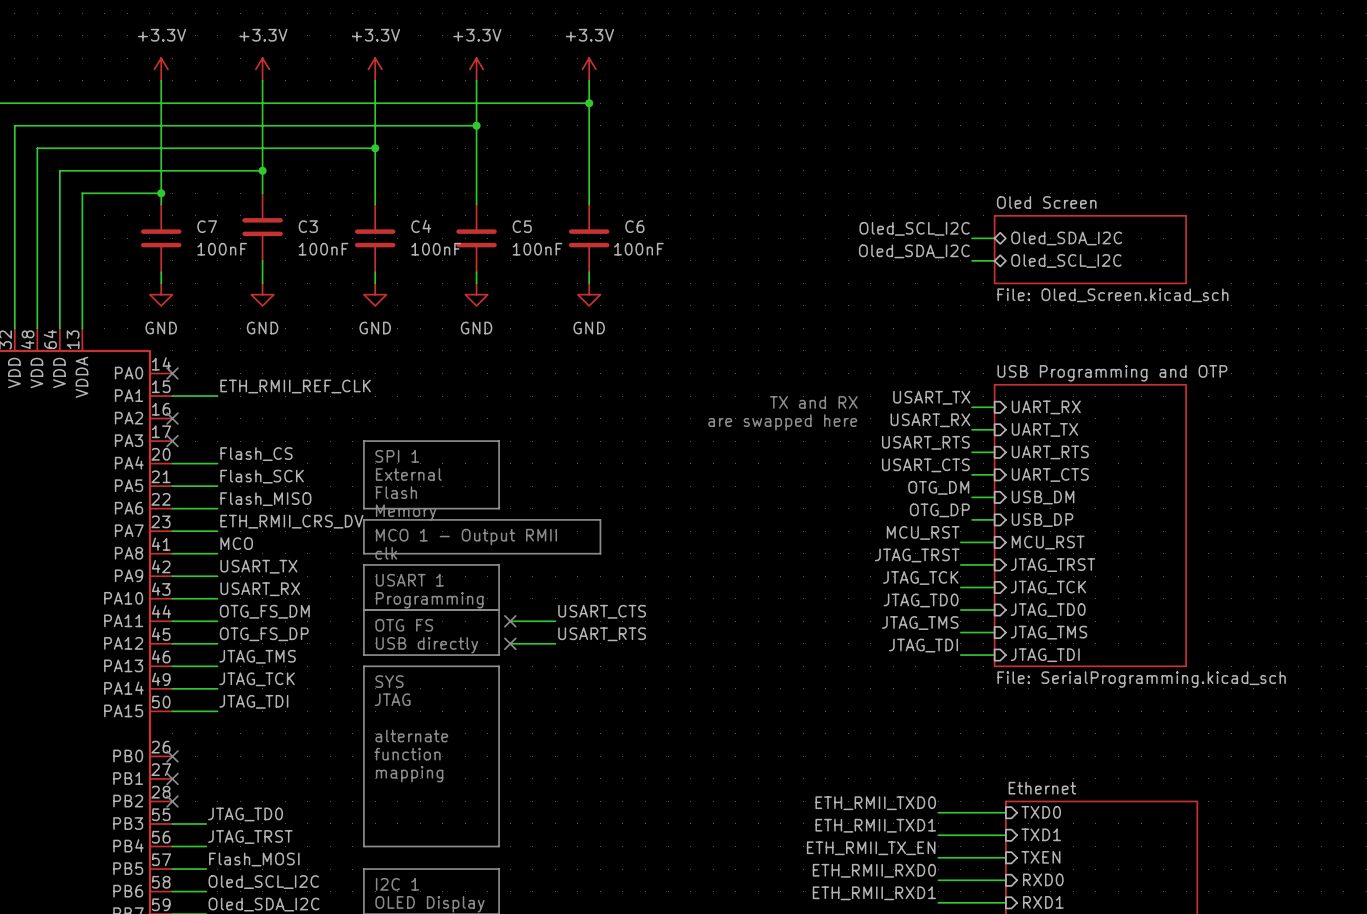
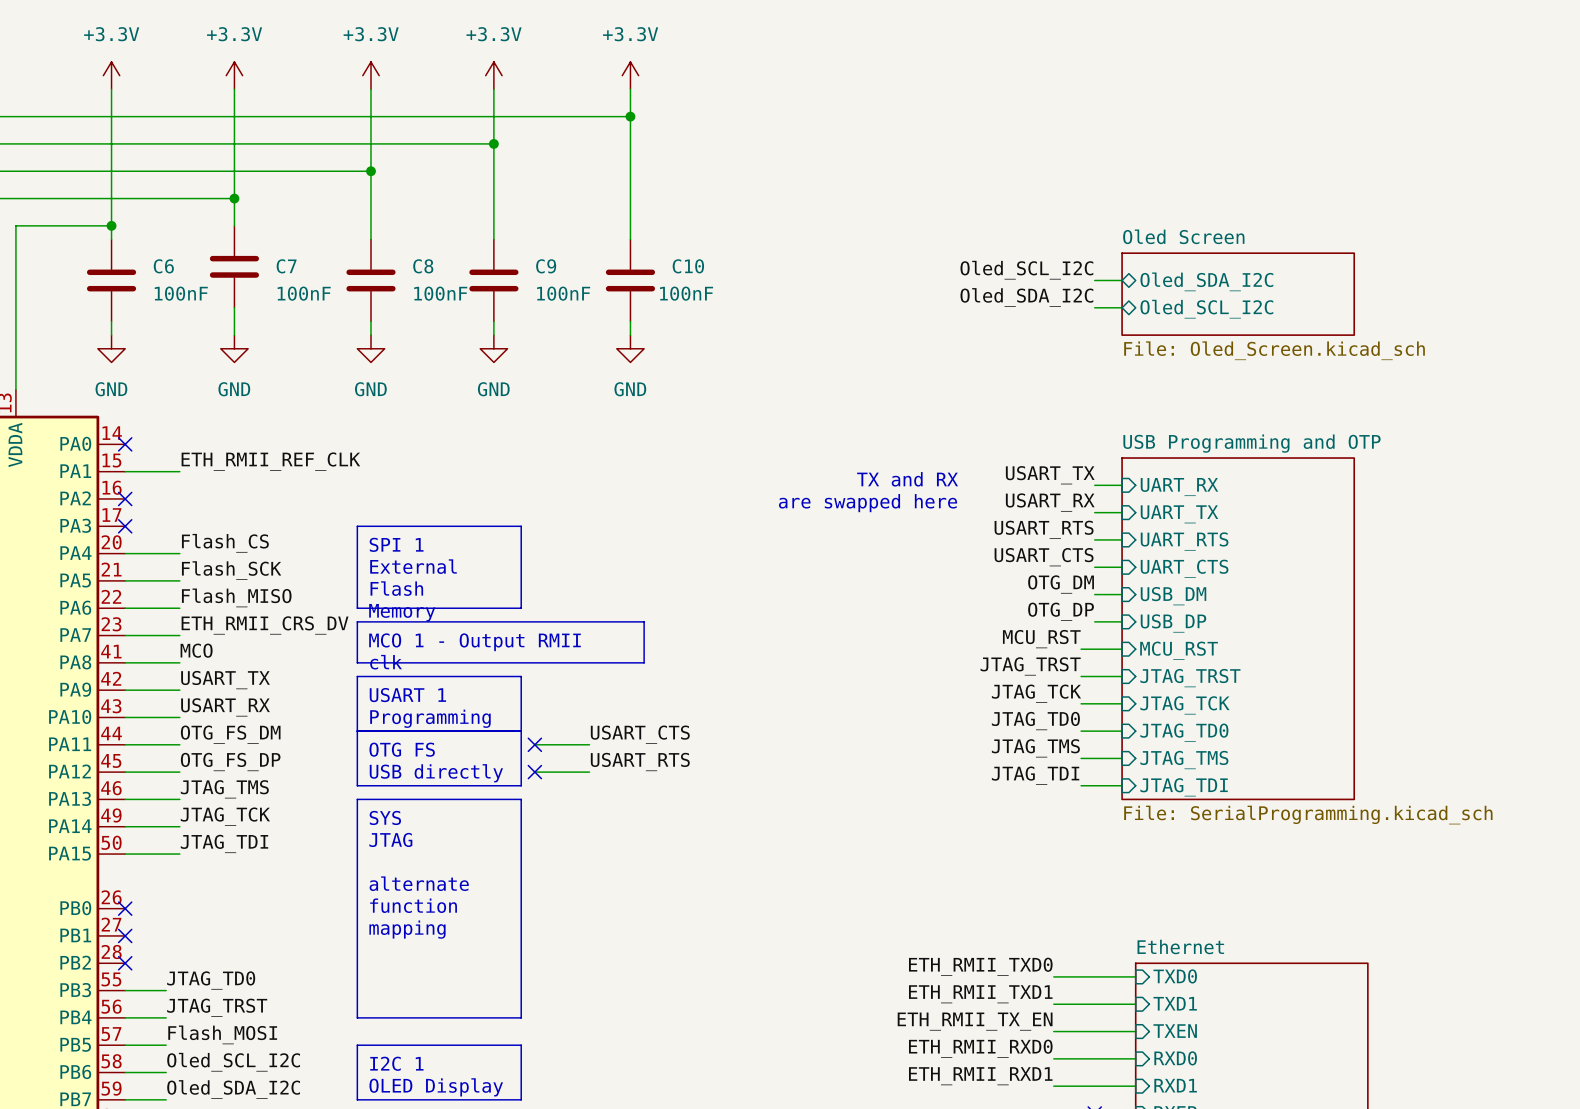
C7 name: C7 (207, 226) -> C6 (163, 266)
C3 name: C3 (308, 226) -> C7 (286, 266)
C4 name: C4 (421, 226) -> C8 (423, 266)
C5 name: C5 (522, 226) -> C9 (546, 266)
C6 name: C6 (634, 226) -> C10 (688, 266)

